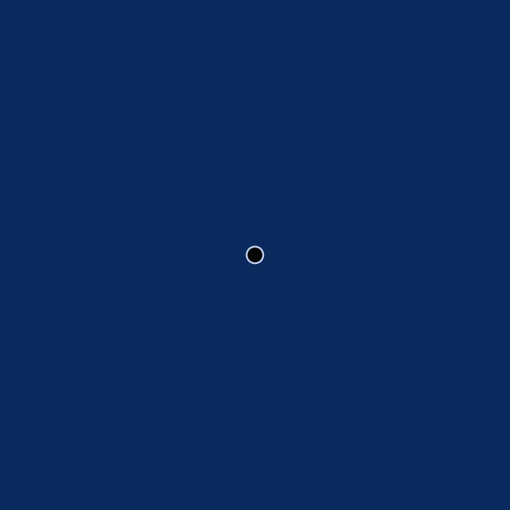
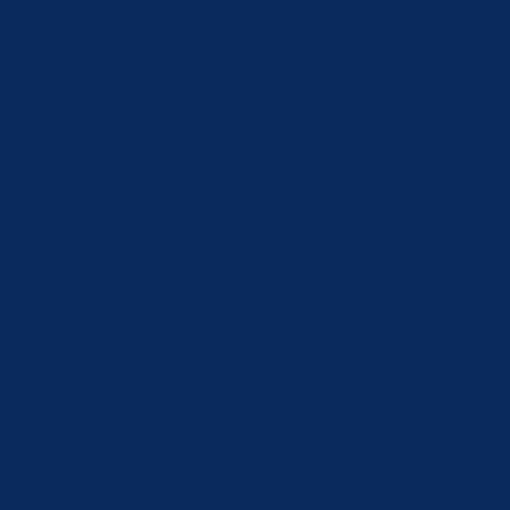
hole: (254, 254) -> none

